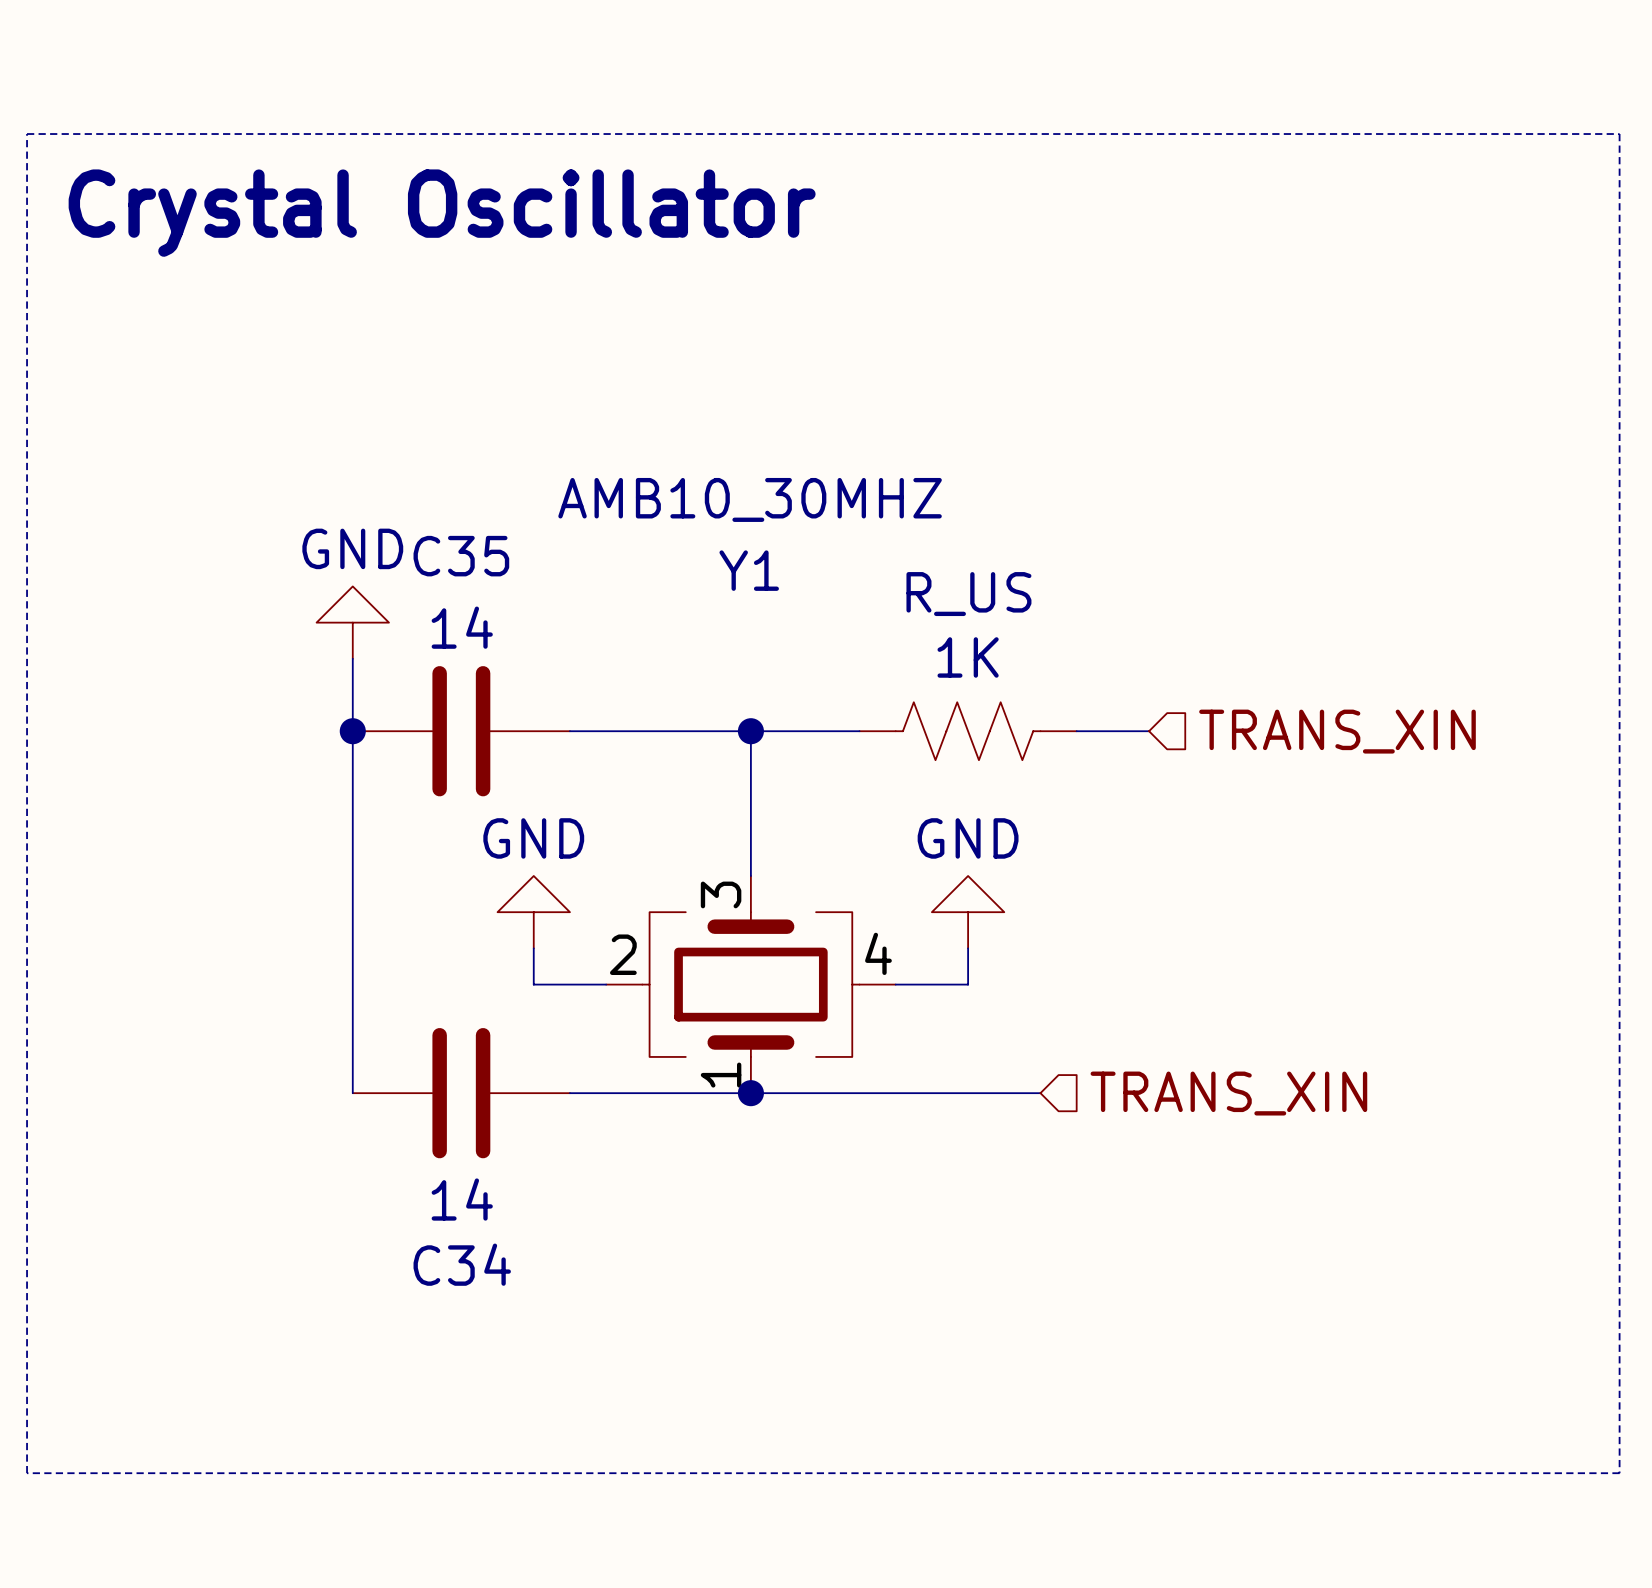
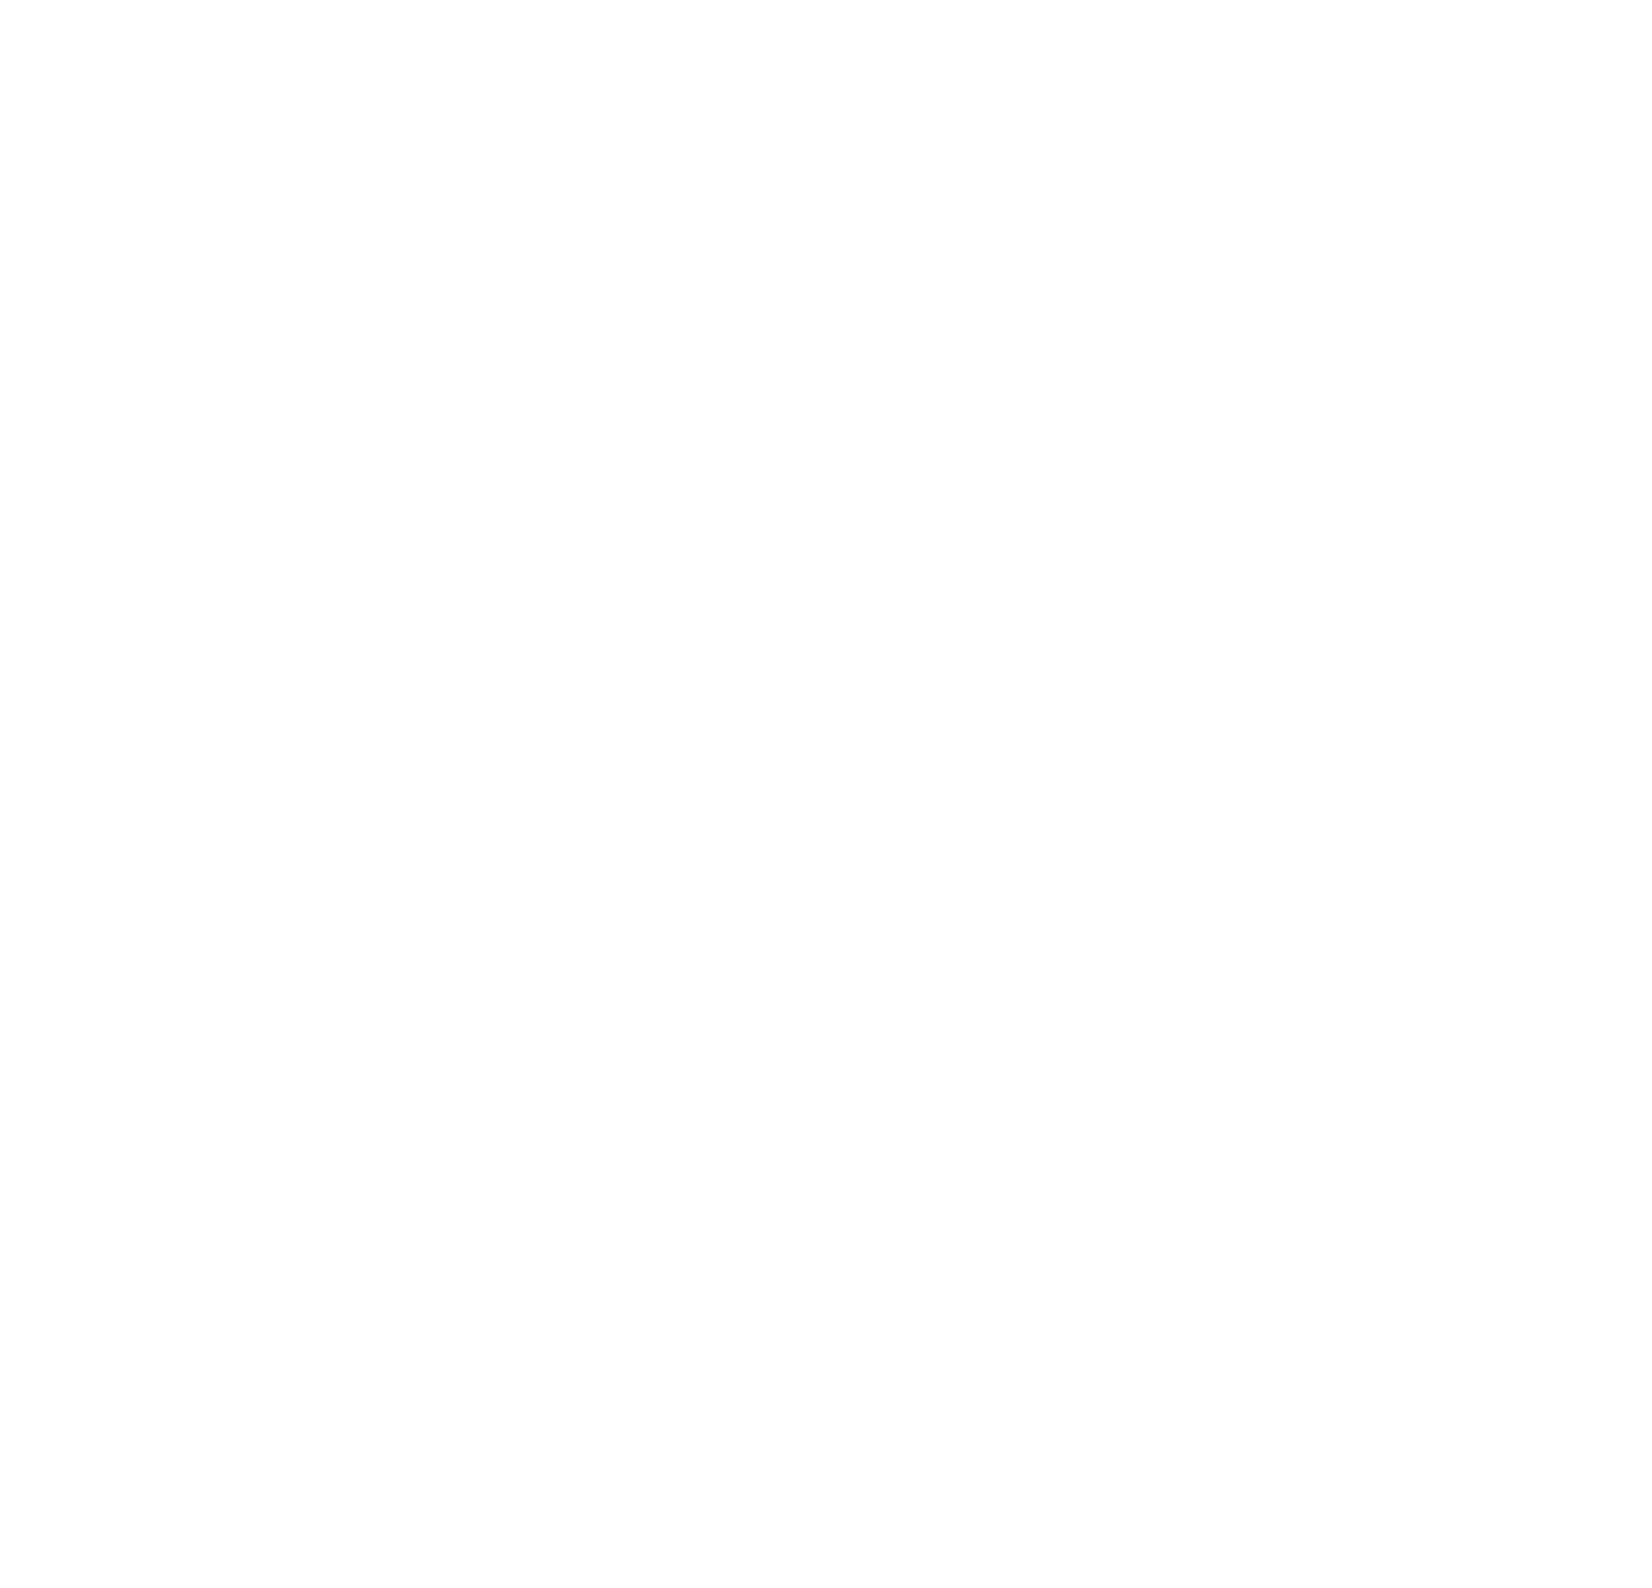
line: (27, 134) (1619, 134) (1619, 1473) (27, 1473) (27, 134) -> none
text: Crystal Oscillator (442, 213) -> none
power symbol: GND (352, 622) -> none
wire: (352, 658) (352, 1093) -> none
junction: (352, 731) -> none
C35: 14 (461, 731) -> none
wire: (569, 731) (859, 731) -> none
wire: (750, 731) (750, 875) -> none
junction: (750, 731) -> none
1K: R_US (968, 731) -> none
wire: (1076, 731) (1149, 731) -> none
hierarchical label: TRANS_XIN (1337, 731) -> none
power symbol: GND (533, 912) -> none
power symbol: GND (968, 912) -> none
wire: (533, 948) (533, 984) (606, 984) -> none
wire: (968, 948) (968, 984) (895, 984) -> none
Y1: AMB10_30MHZ (750, 984) -> none
C34: 14 (461, 1093) -> none
wire: (569, 1093) (1040, 1093) -> none
junction: (750, 1093) -> none
hierarchical label: TRANS_XIN (1228, 1093) -> none

